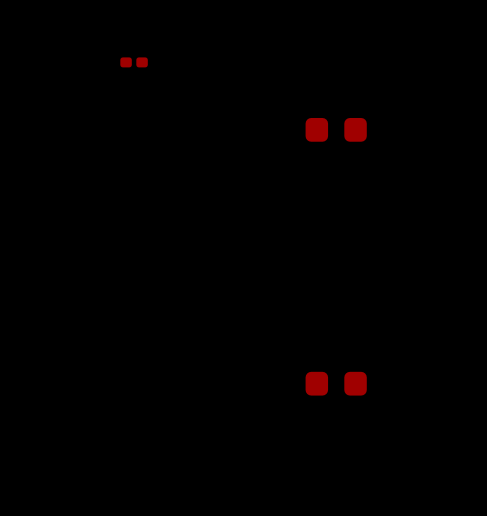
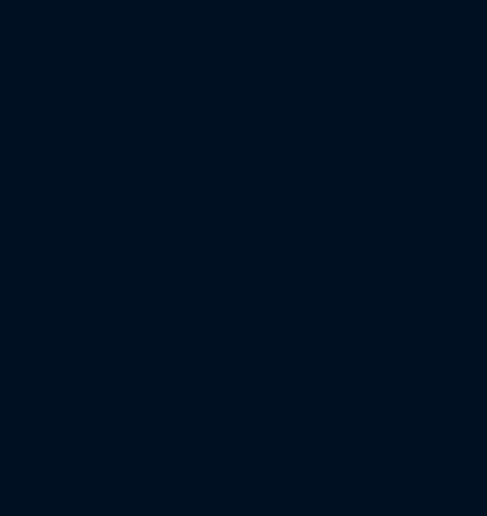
part: (134, 62) -> none
part: (336, 129) -> none
part: (336, 383) -> none

